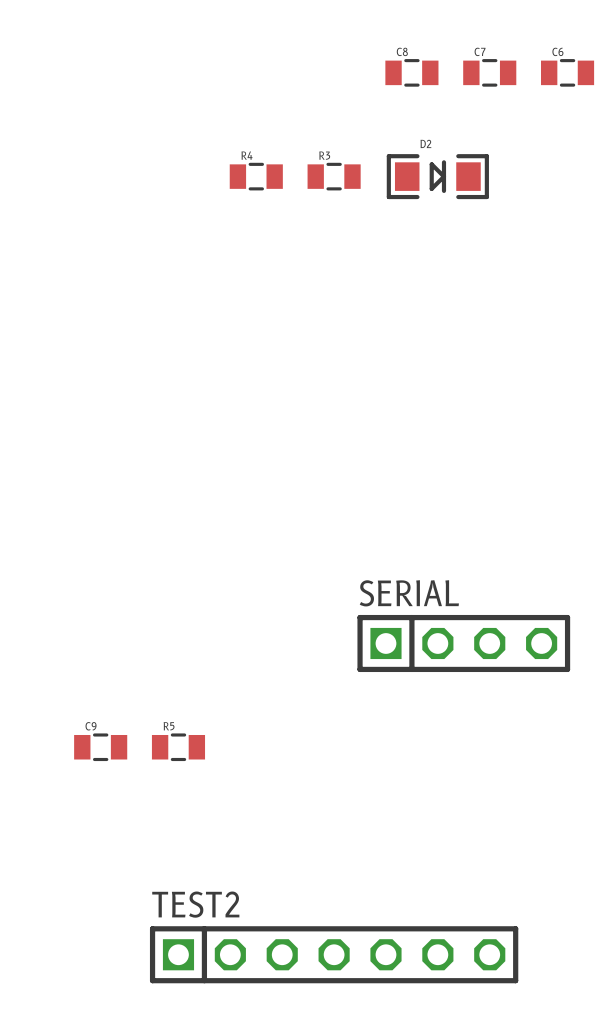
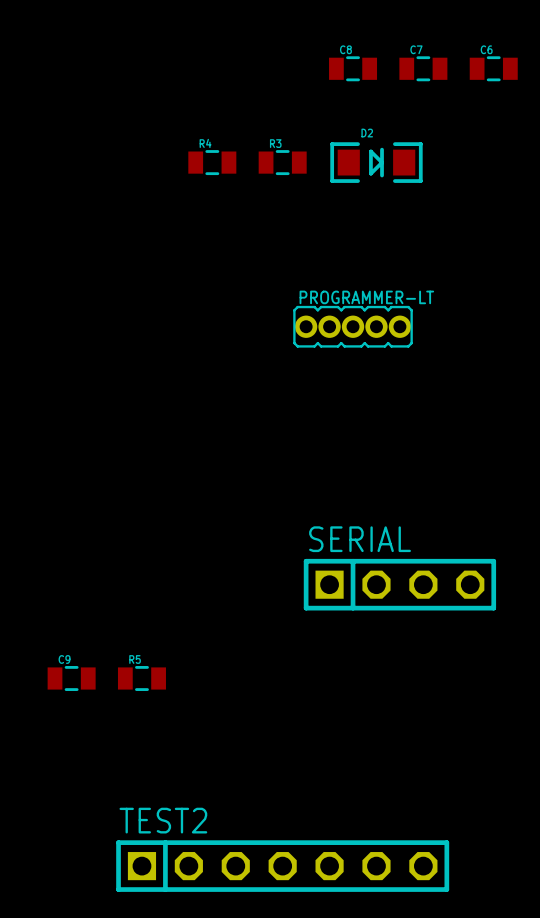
PROGRAMMER-LT: none -> (353, 326)

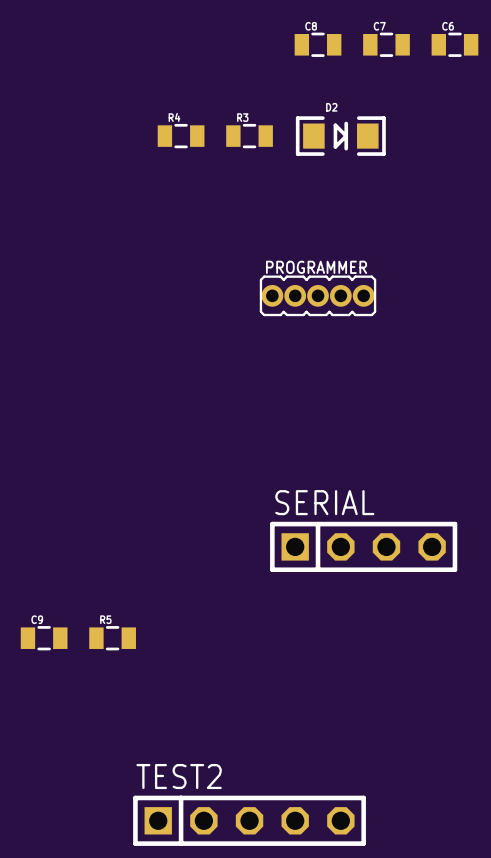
PROGRAMMER-LT name: PROGRAMMER-LT (366, 297) -> PROGRAMMER (316, 267)
TEST2 name position: TEST2 (163, 820) -> TEST2 (179, 776)
TEST2 footprint: [116, 840, 450, 892] -> [133, 795, 366, 846]

